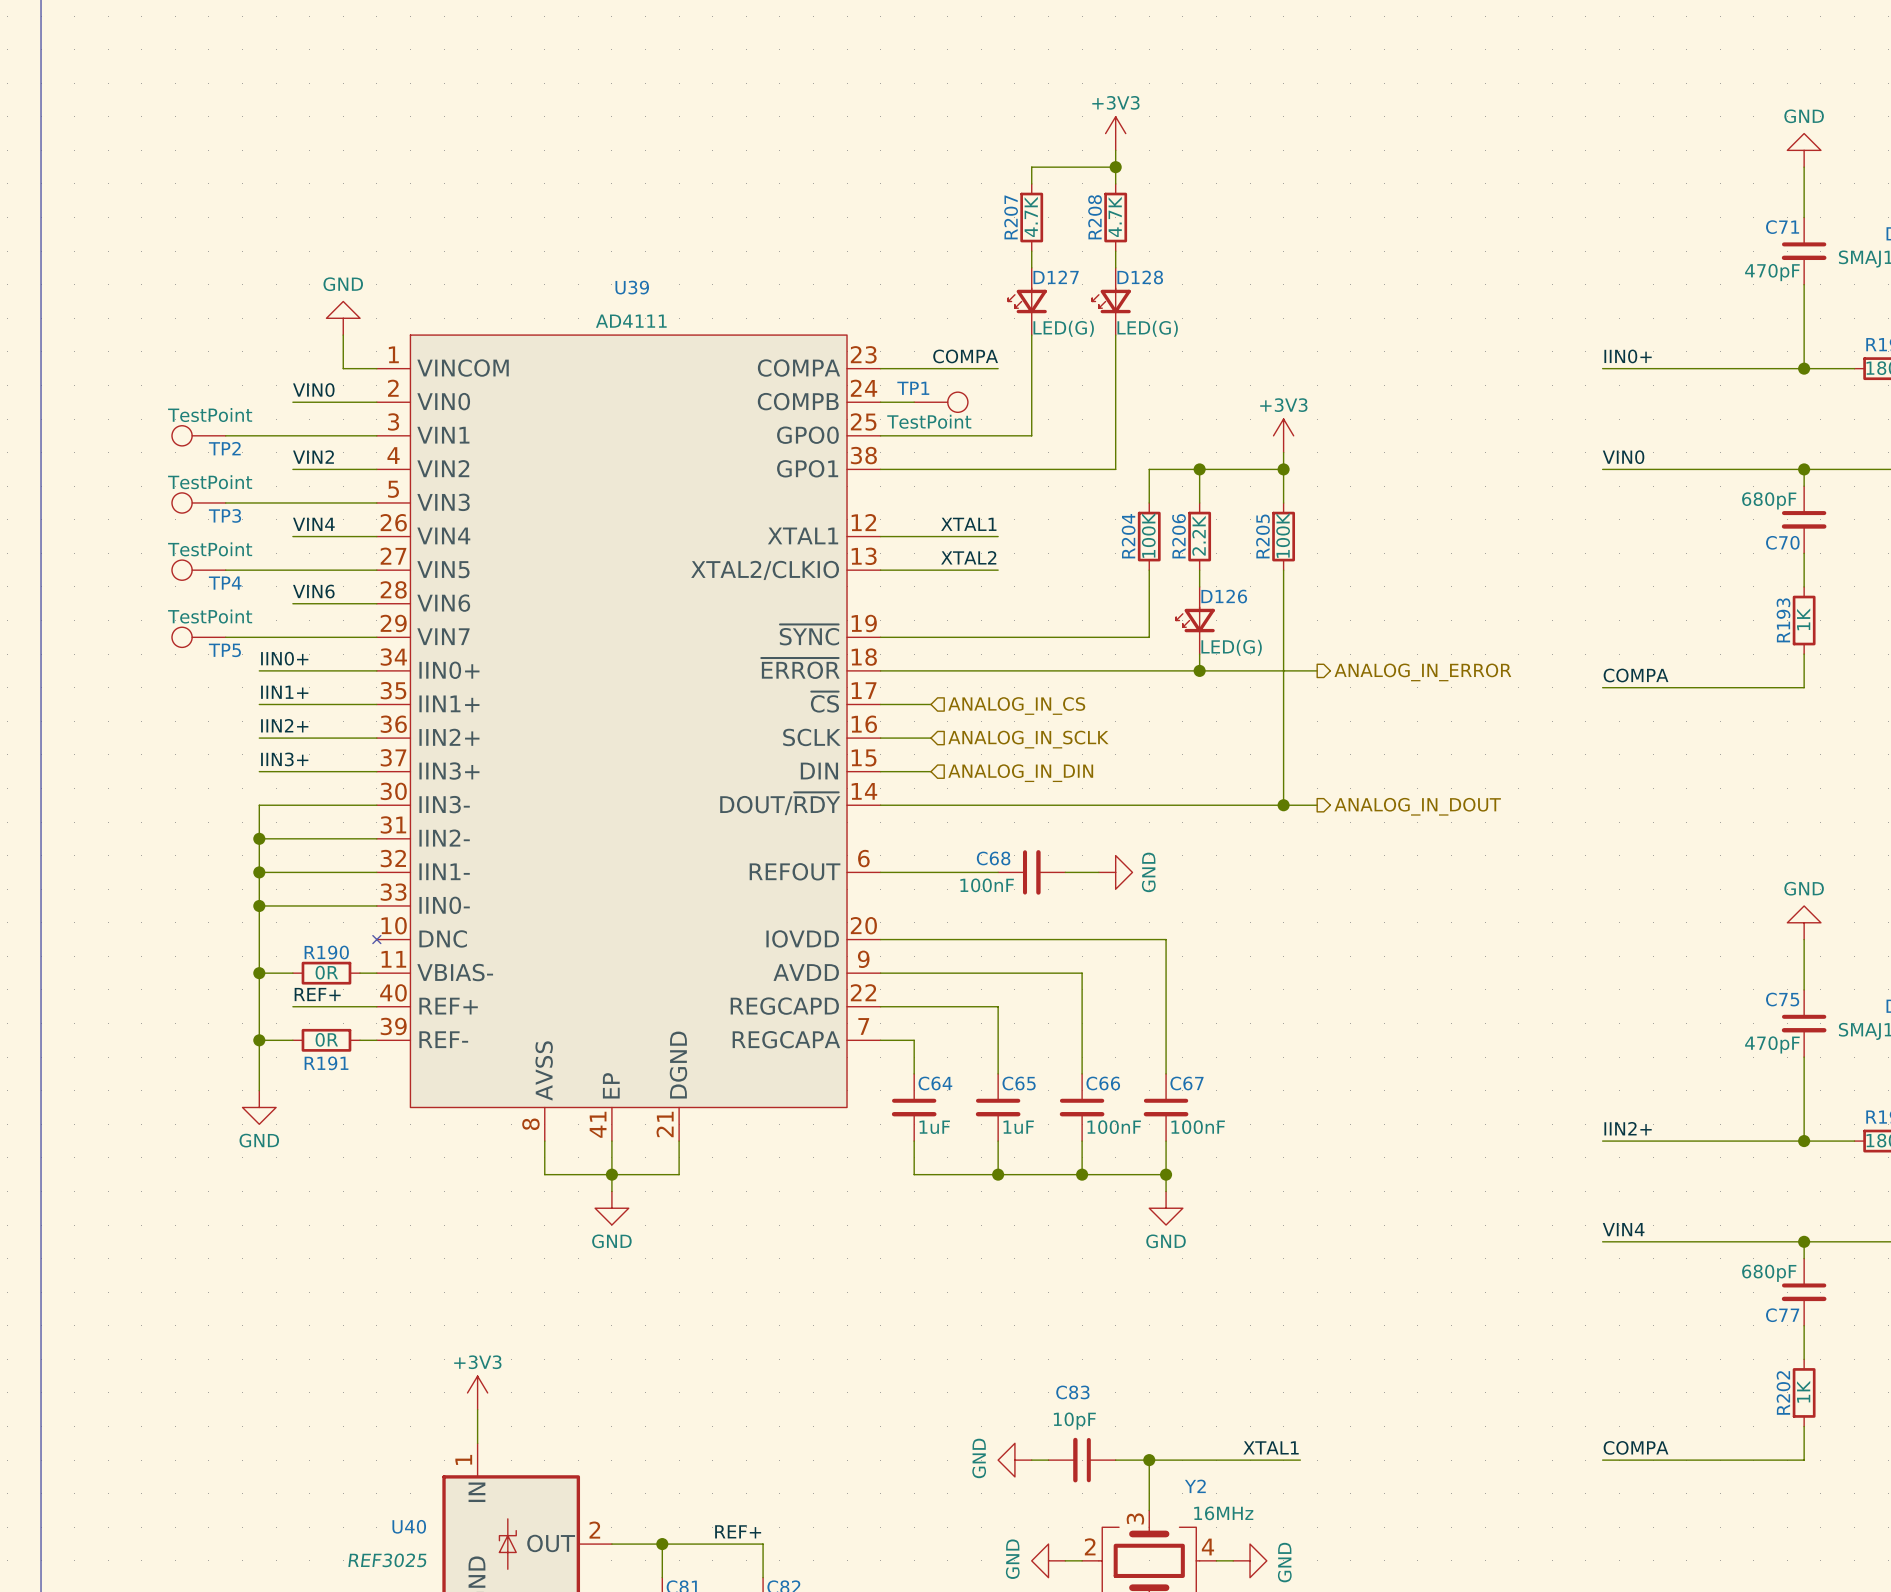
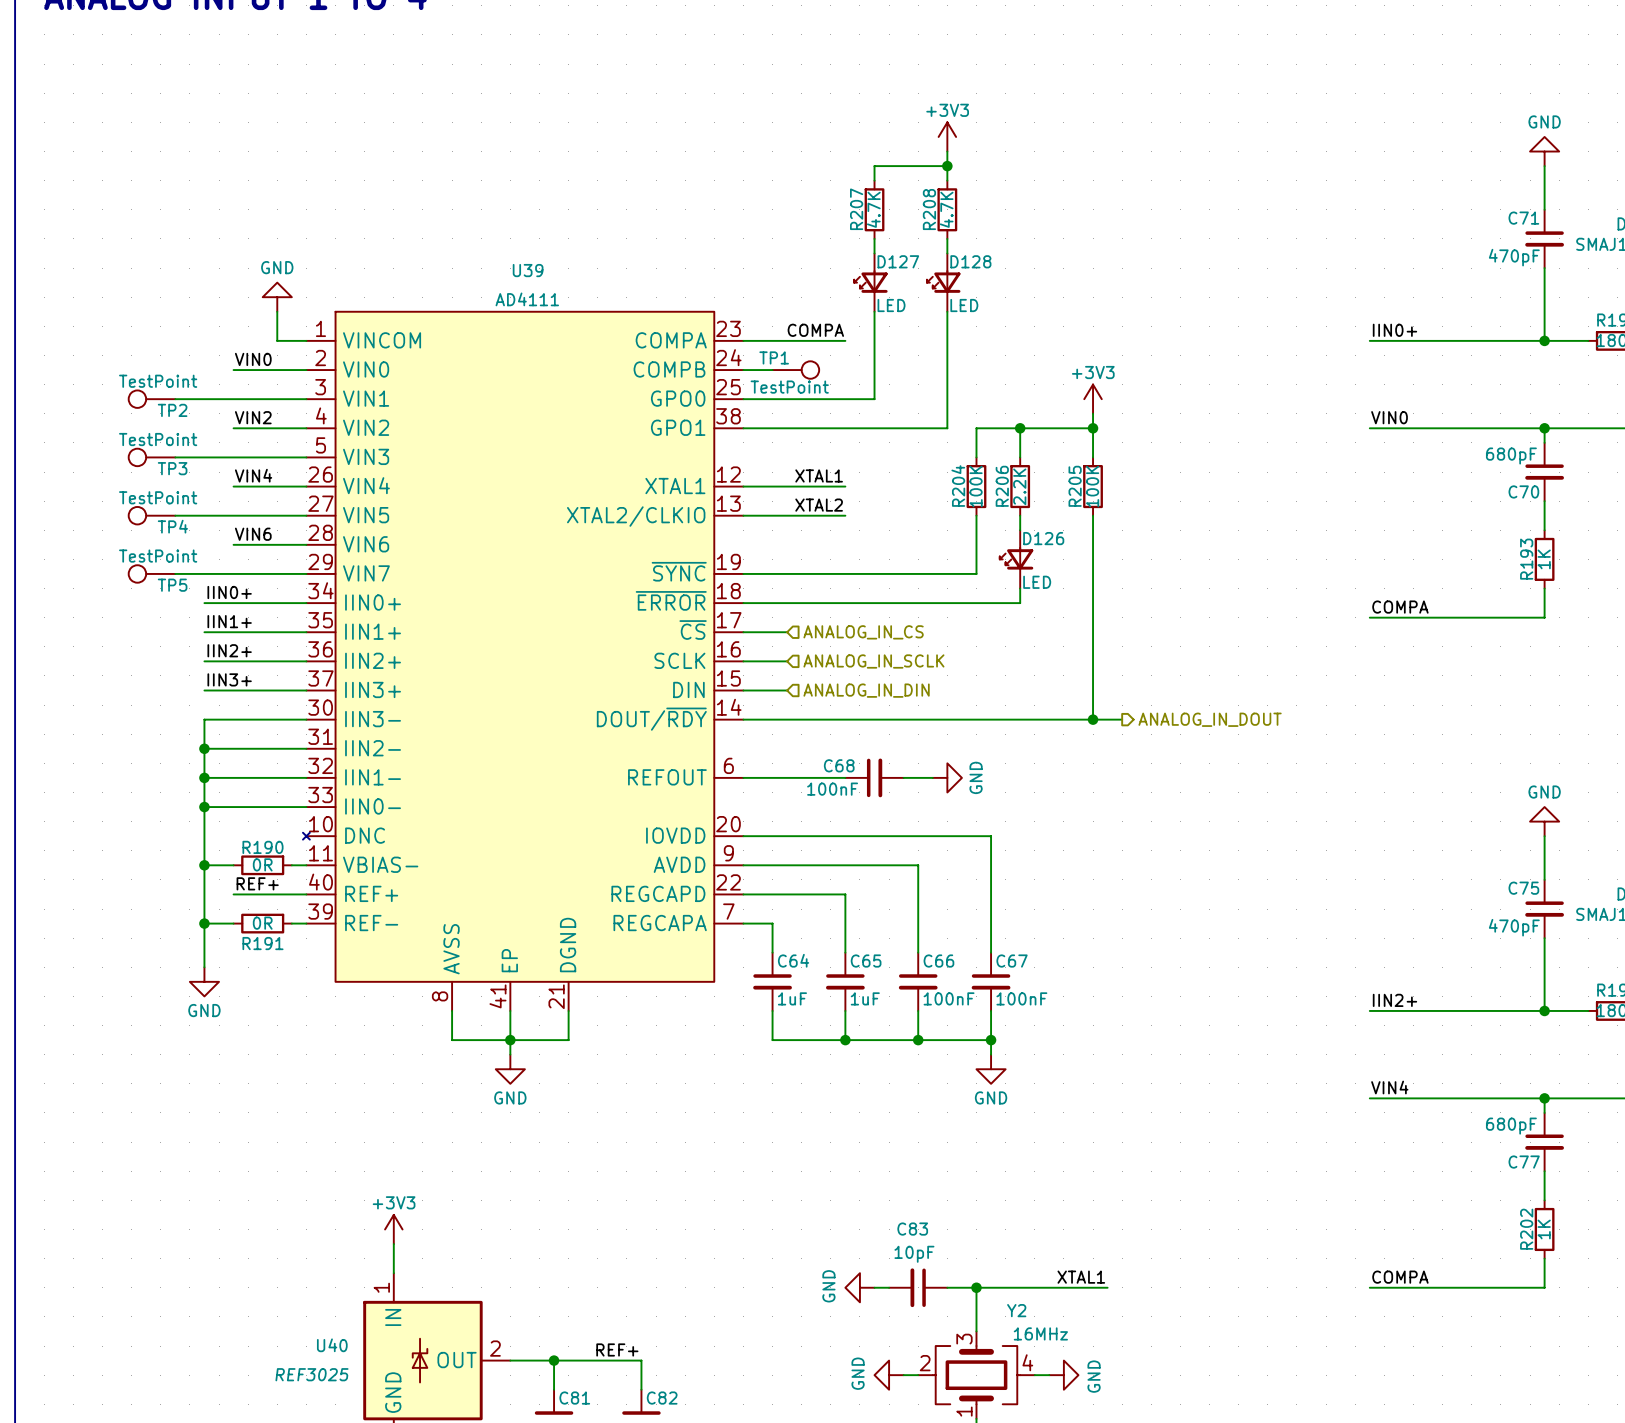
D127 value: LED(G) (1063, 328) -> LED (891, 305)
D128 value: LED(G) (1147, 328) -> LED (964, 305)
D126 value: LED(G) (1231, 647) -> LED (1037, 582)
wire: (1199, 670) (1317, 670) -> none
junction: (1199, 670) -> none
hierarchical label: ANALOG_IN_ERROR (1422, 672) -> none

